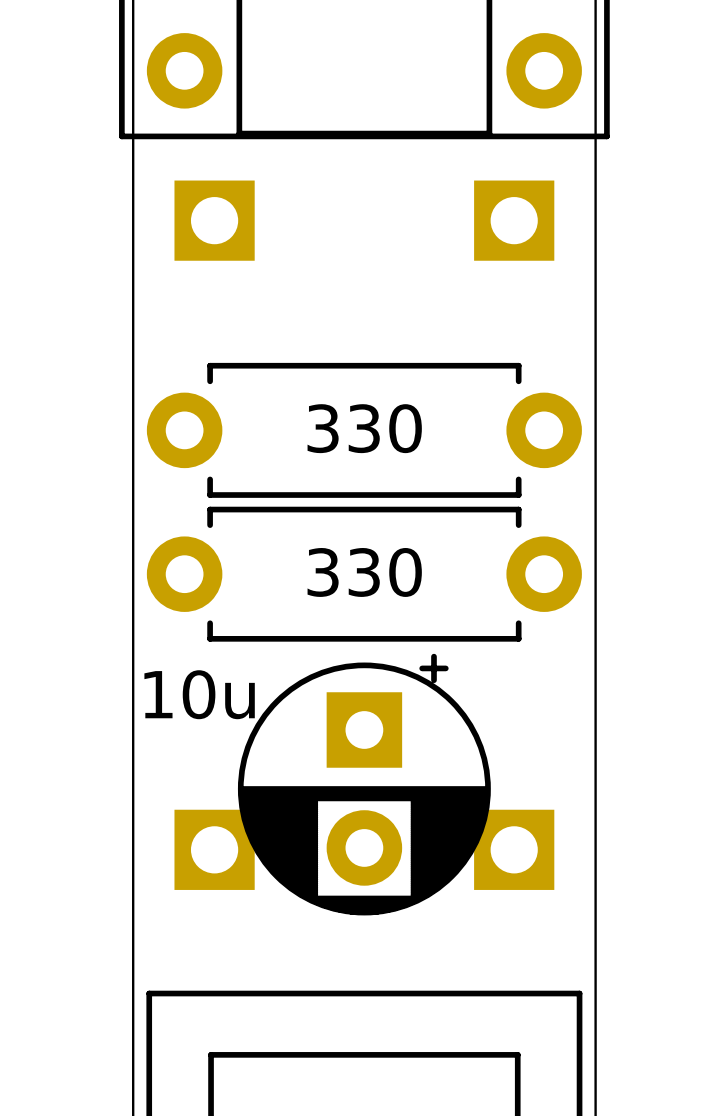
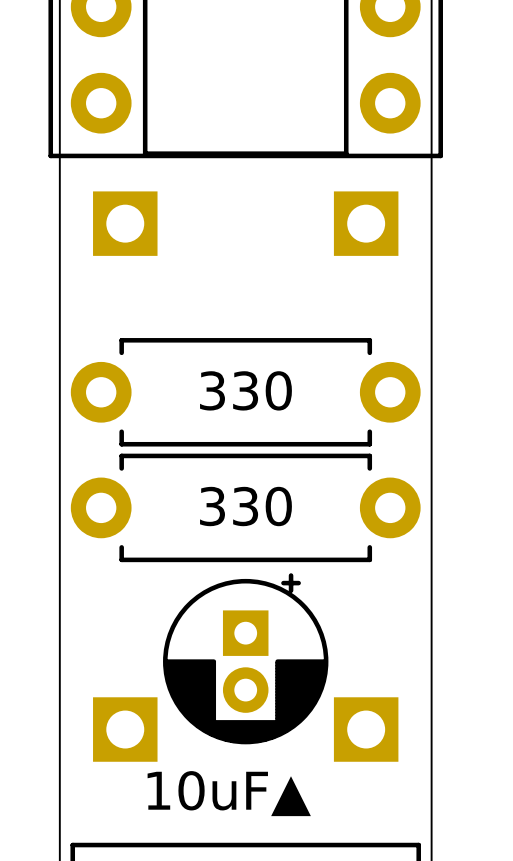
part footprint: [237, 653, 491, 916] -> [163, 573, 329, 745]
part value: 10u (199, 694) -> none
part text: none -> 10uF▲ (229, 793)

